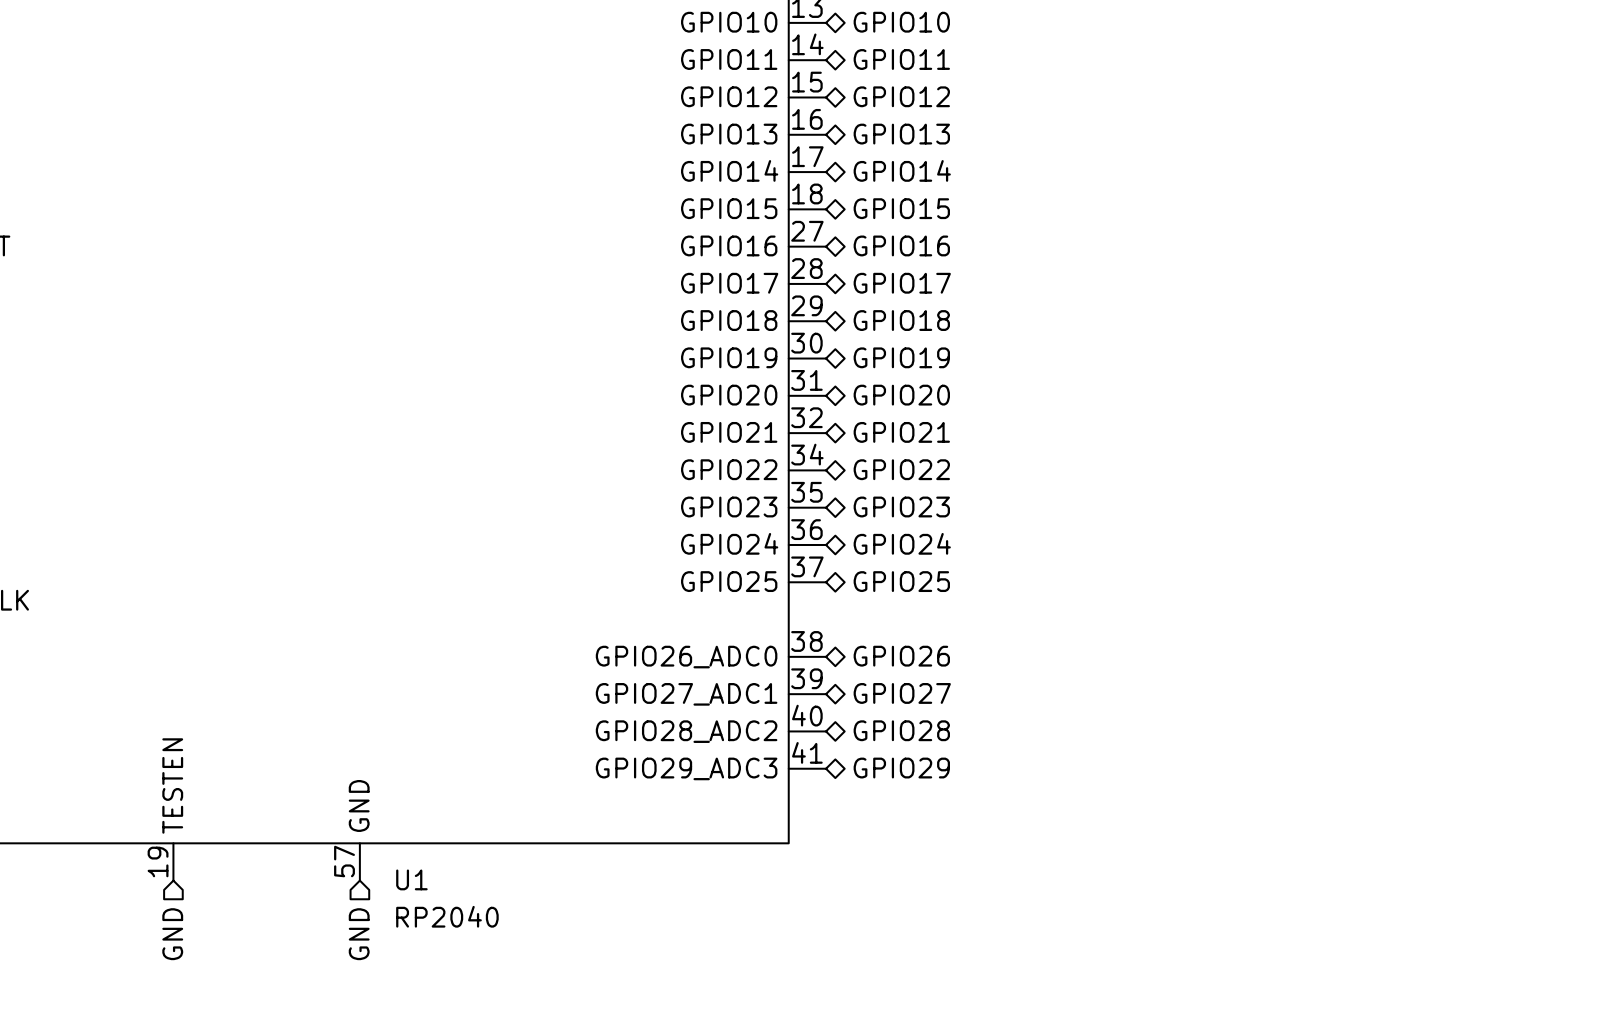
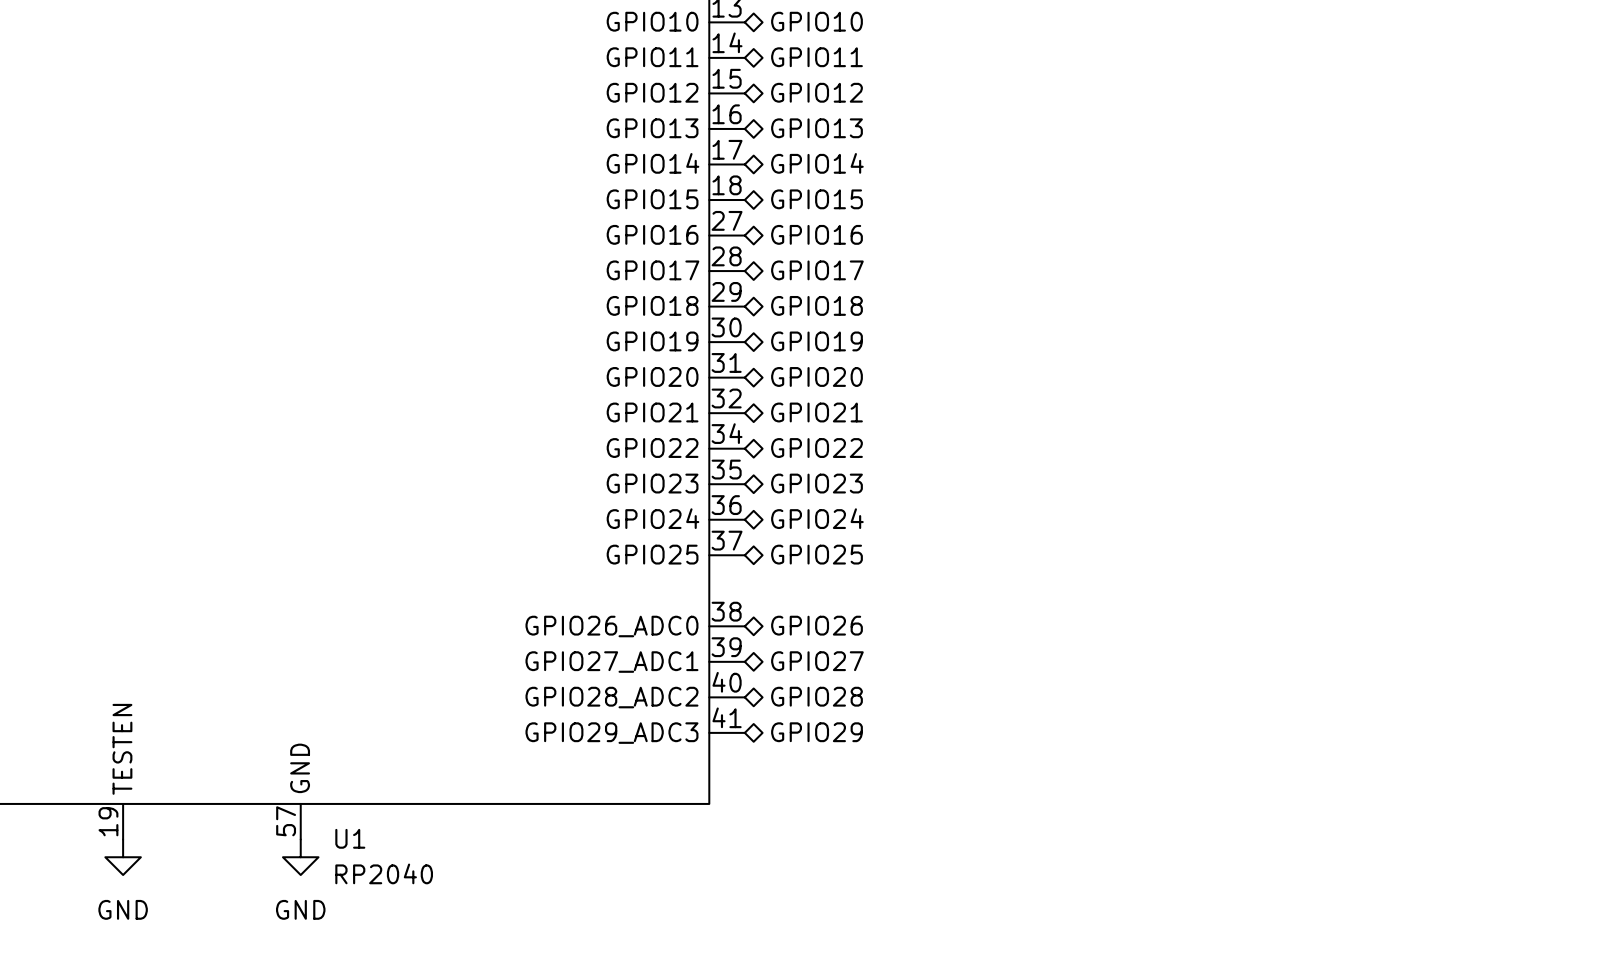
power symbol: none -> GND (123, 857)
power symbol: none -> GND (300, 857)
hierarchical label: GND (172, 934) -> none
hierarchical label: GND (359, 934) -> none

